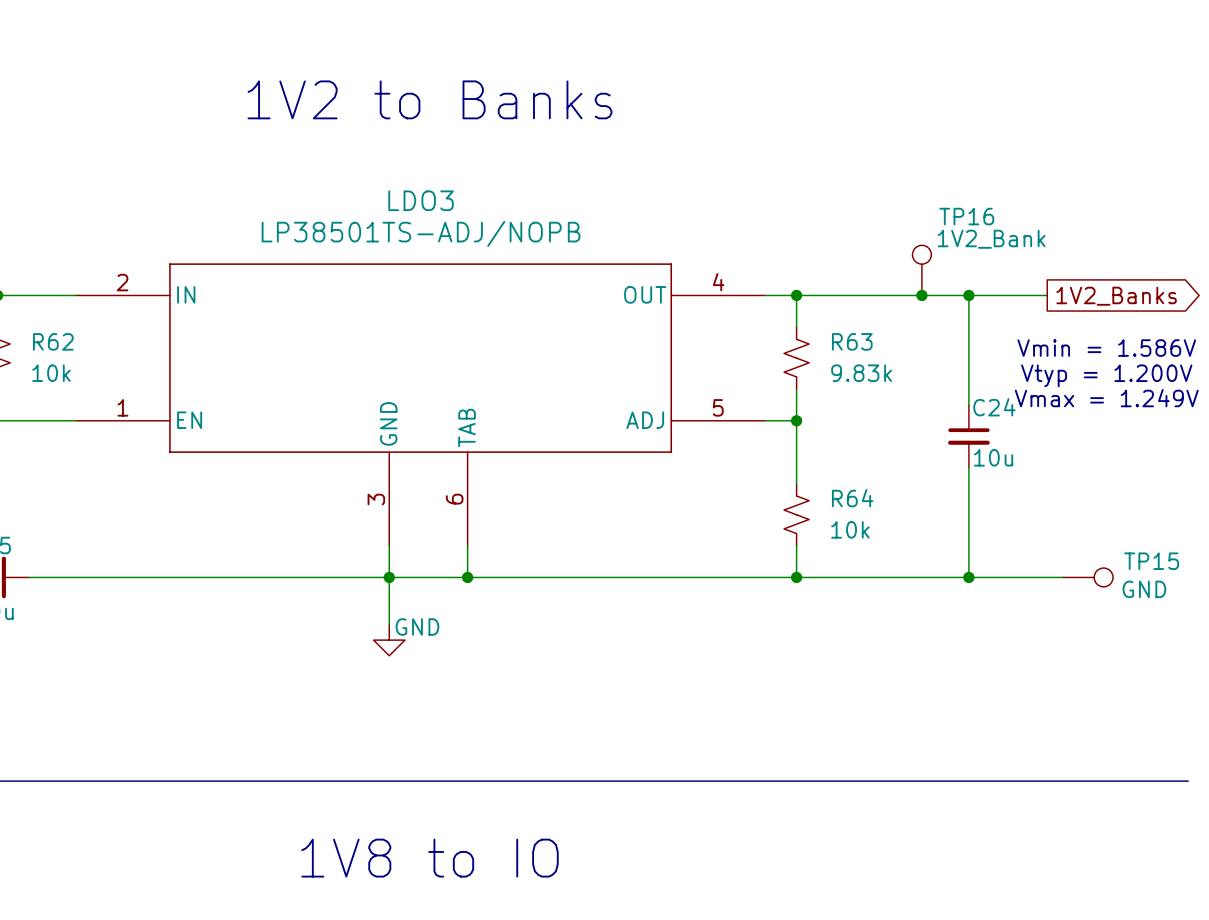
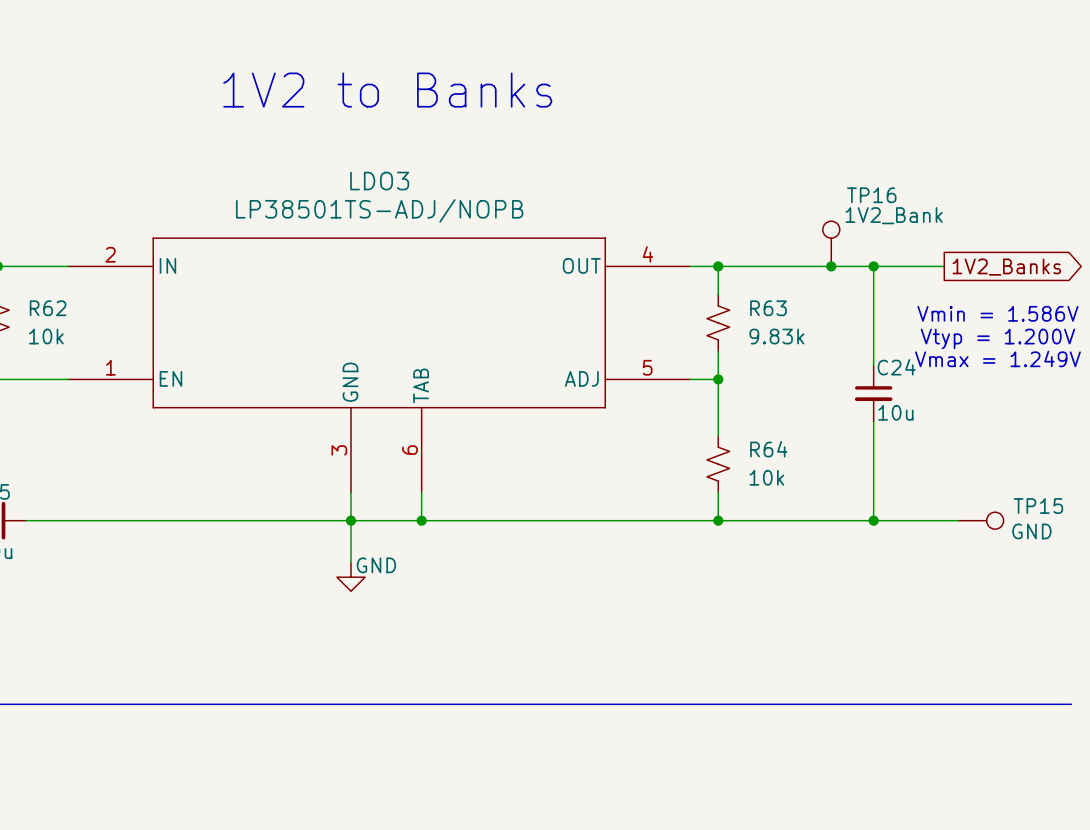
text: 1V8 to IO (430, 858) -> none

